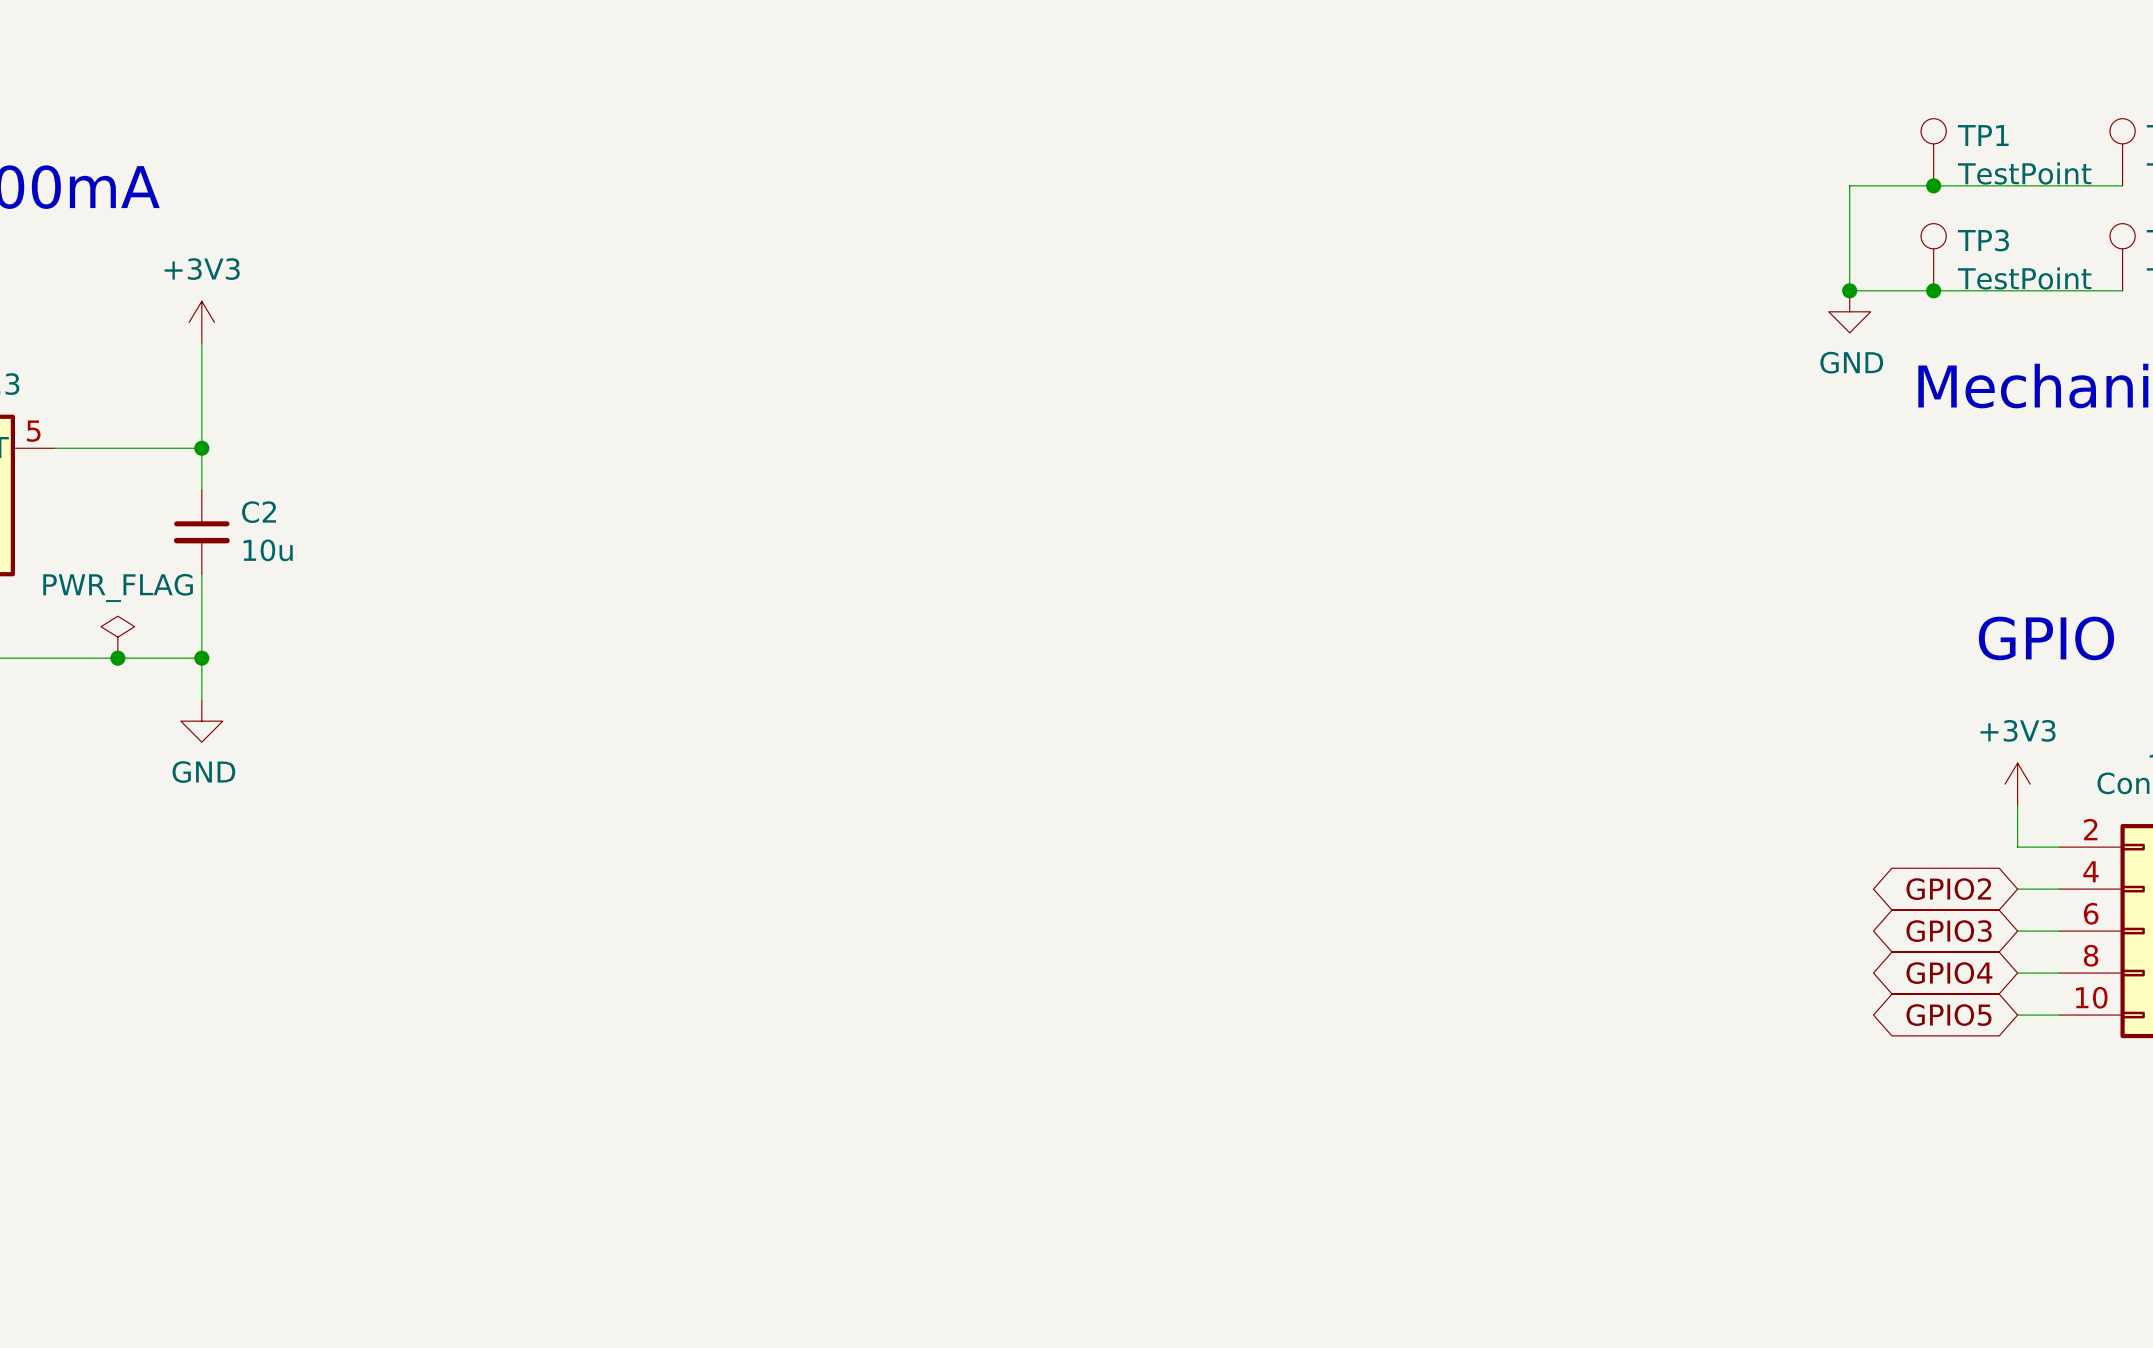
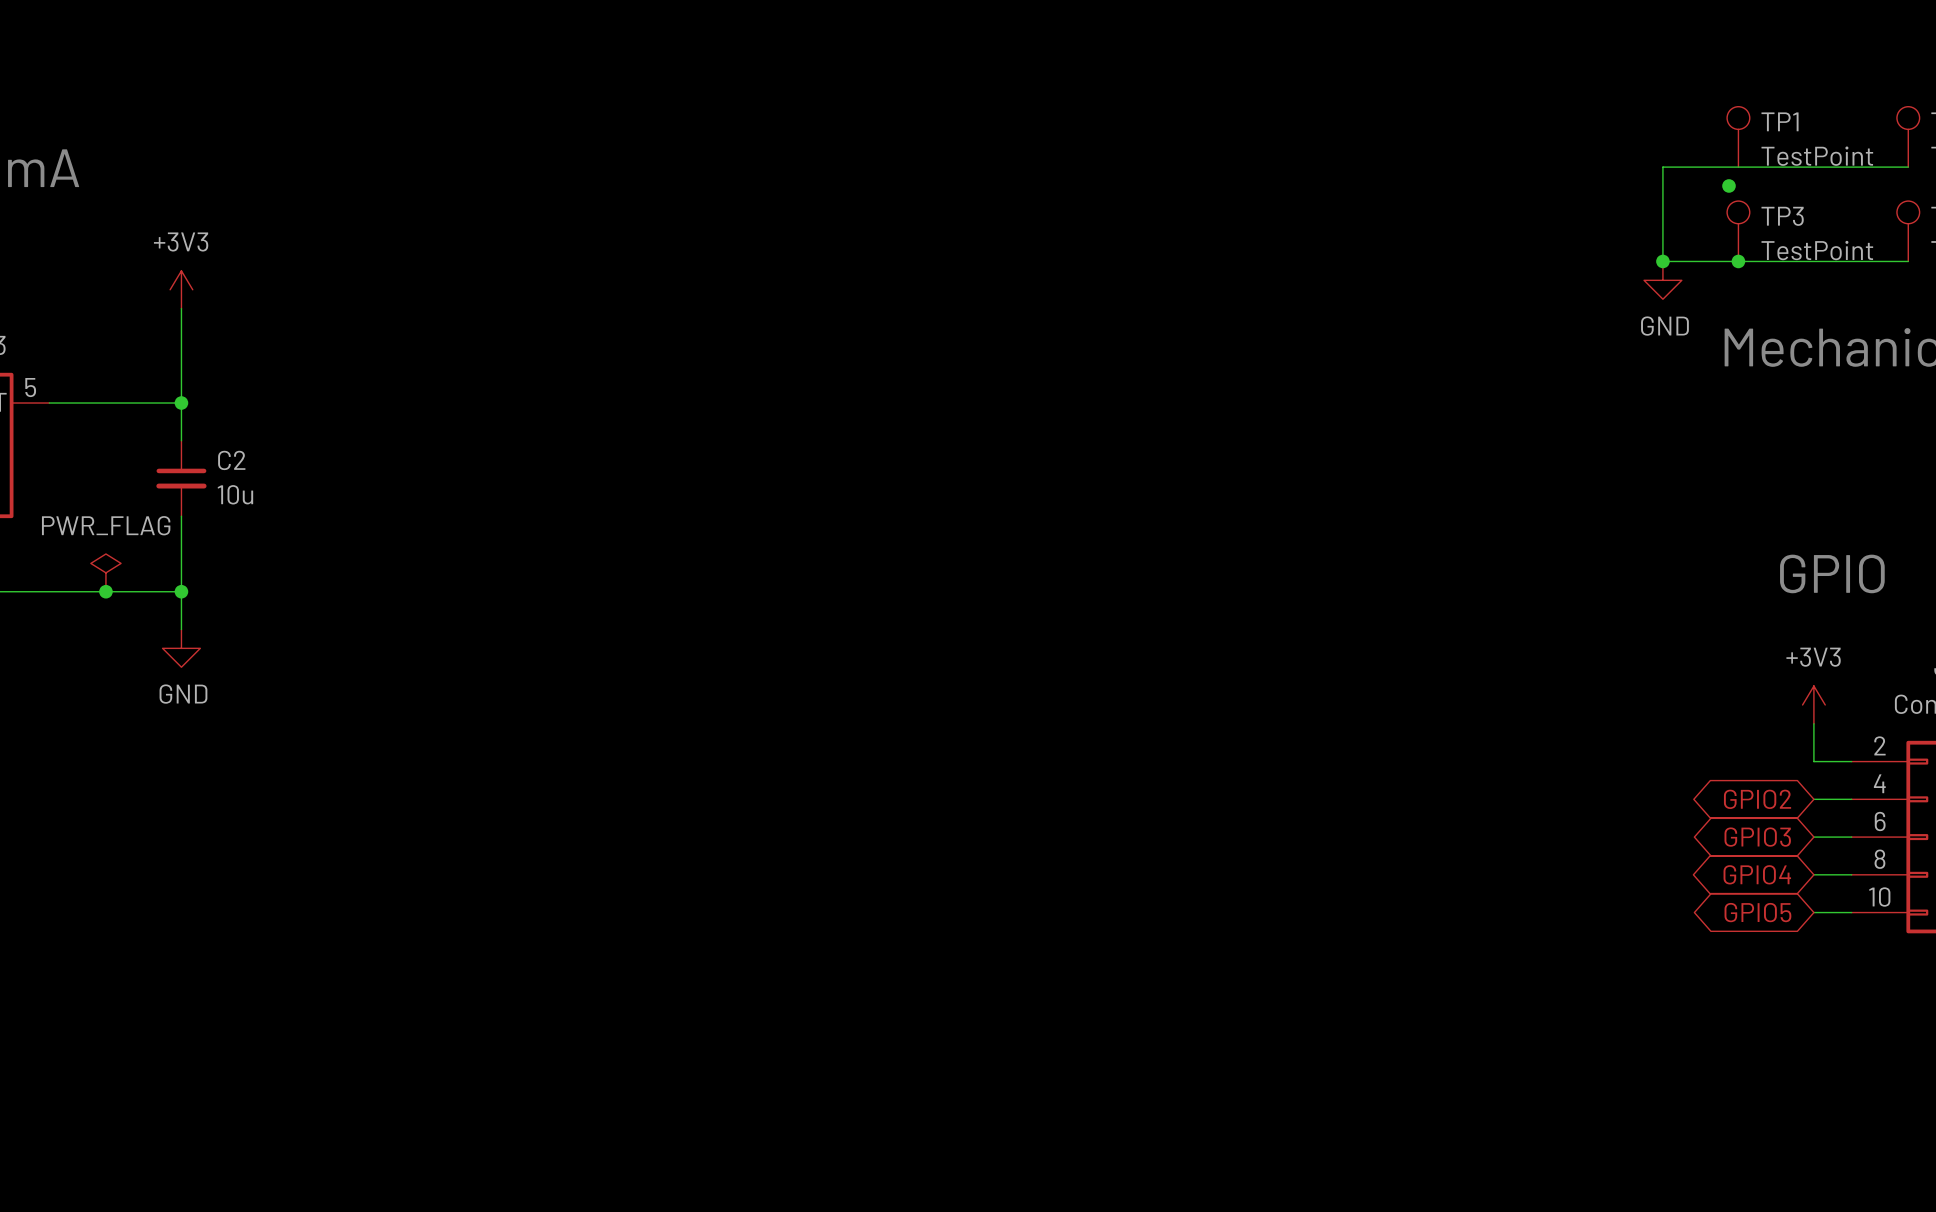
junction position: (1933, 185) -> (1728, 185)

